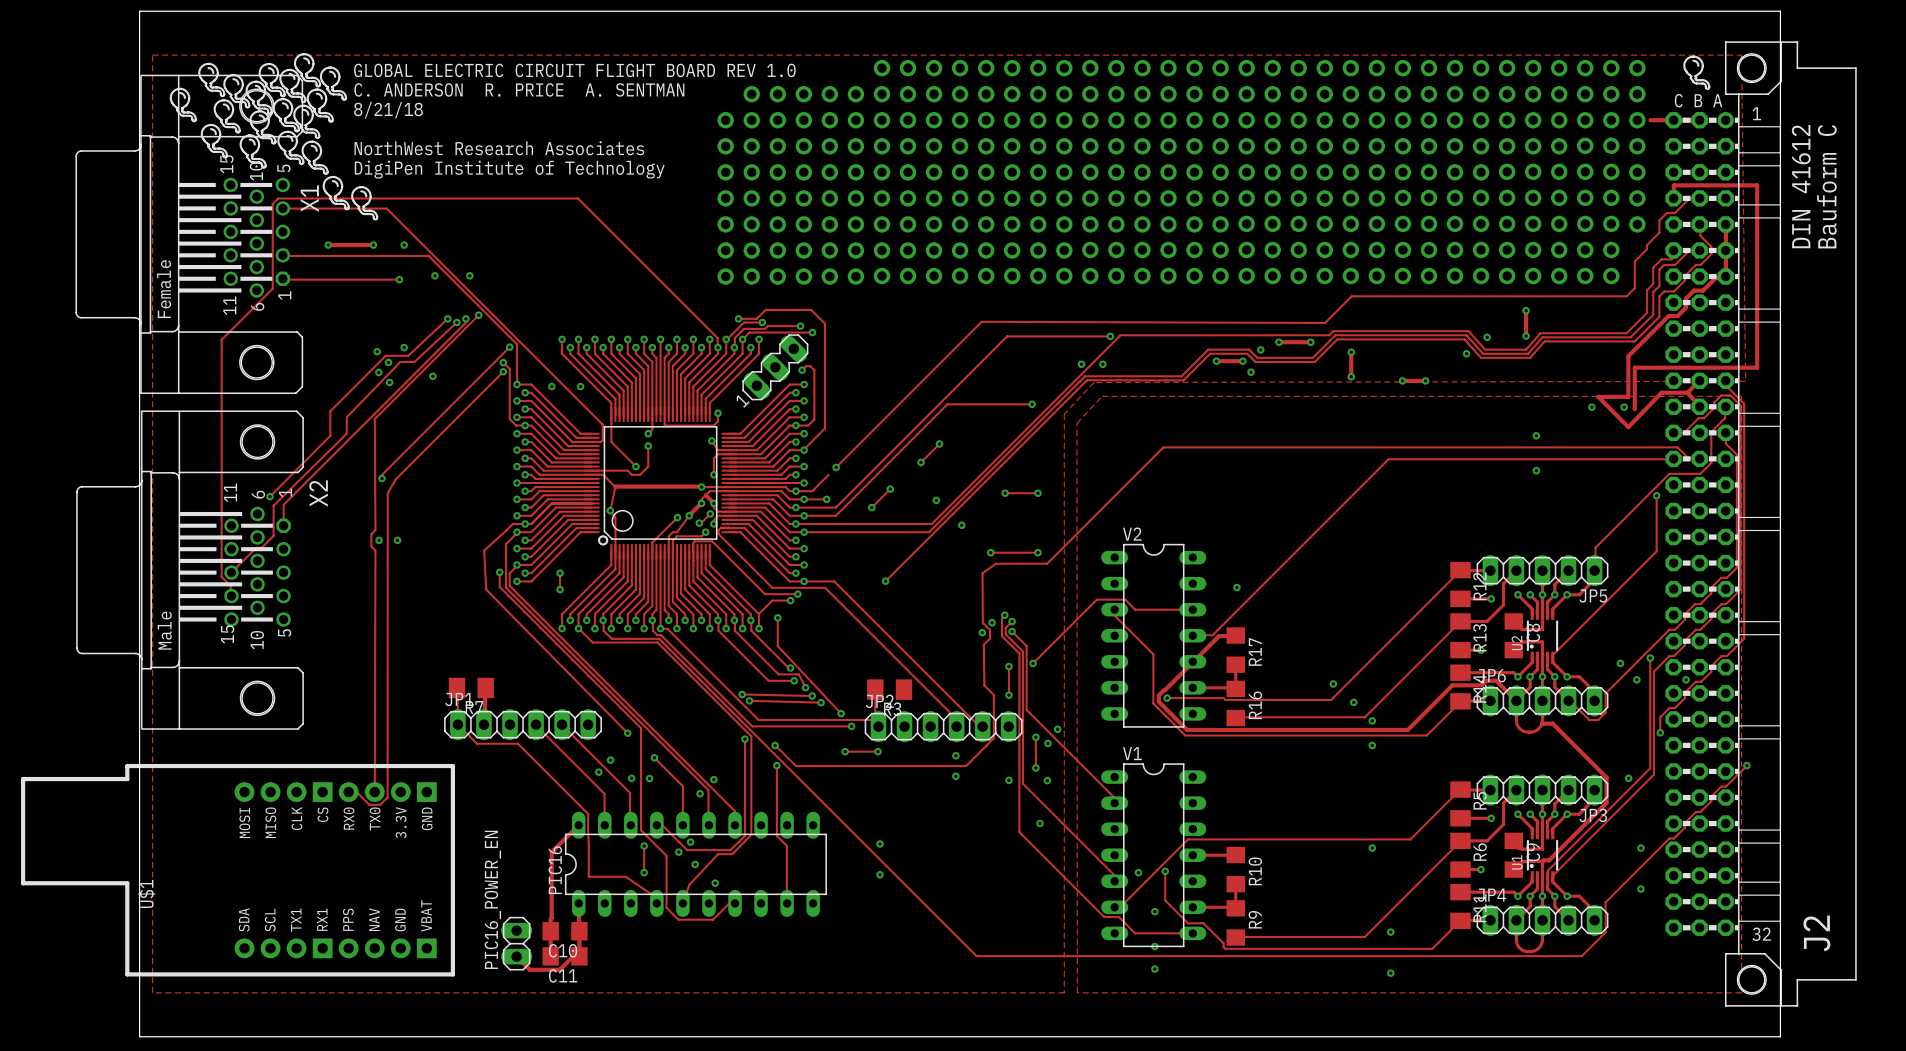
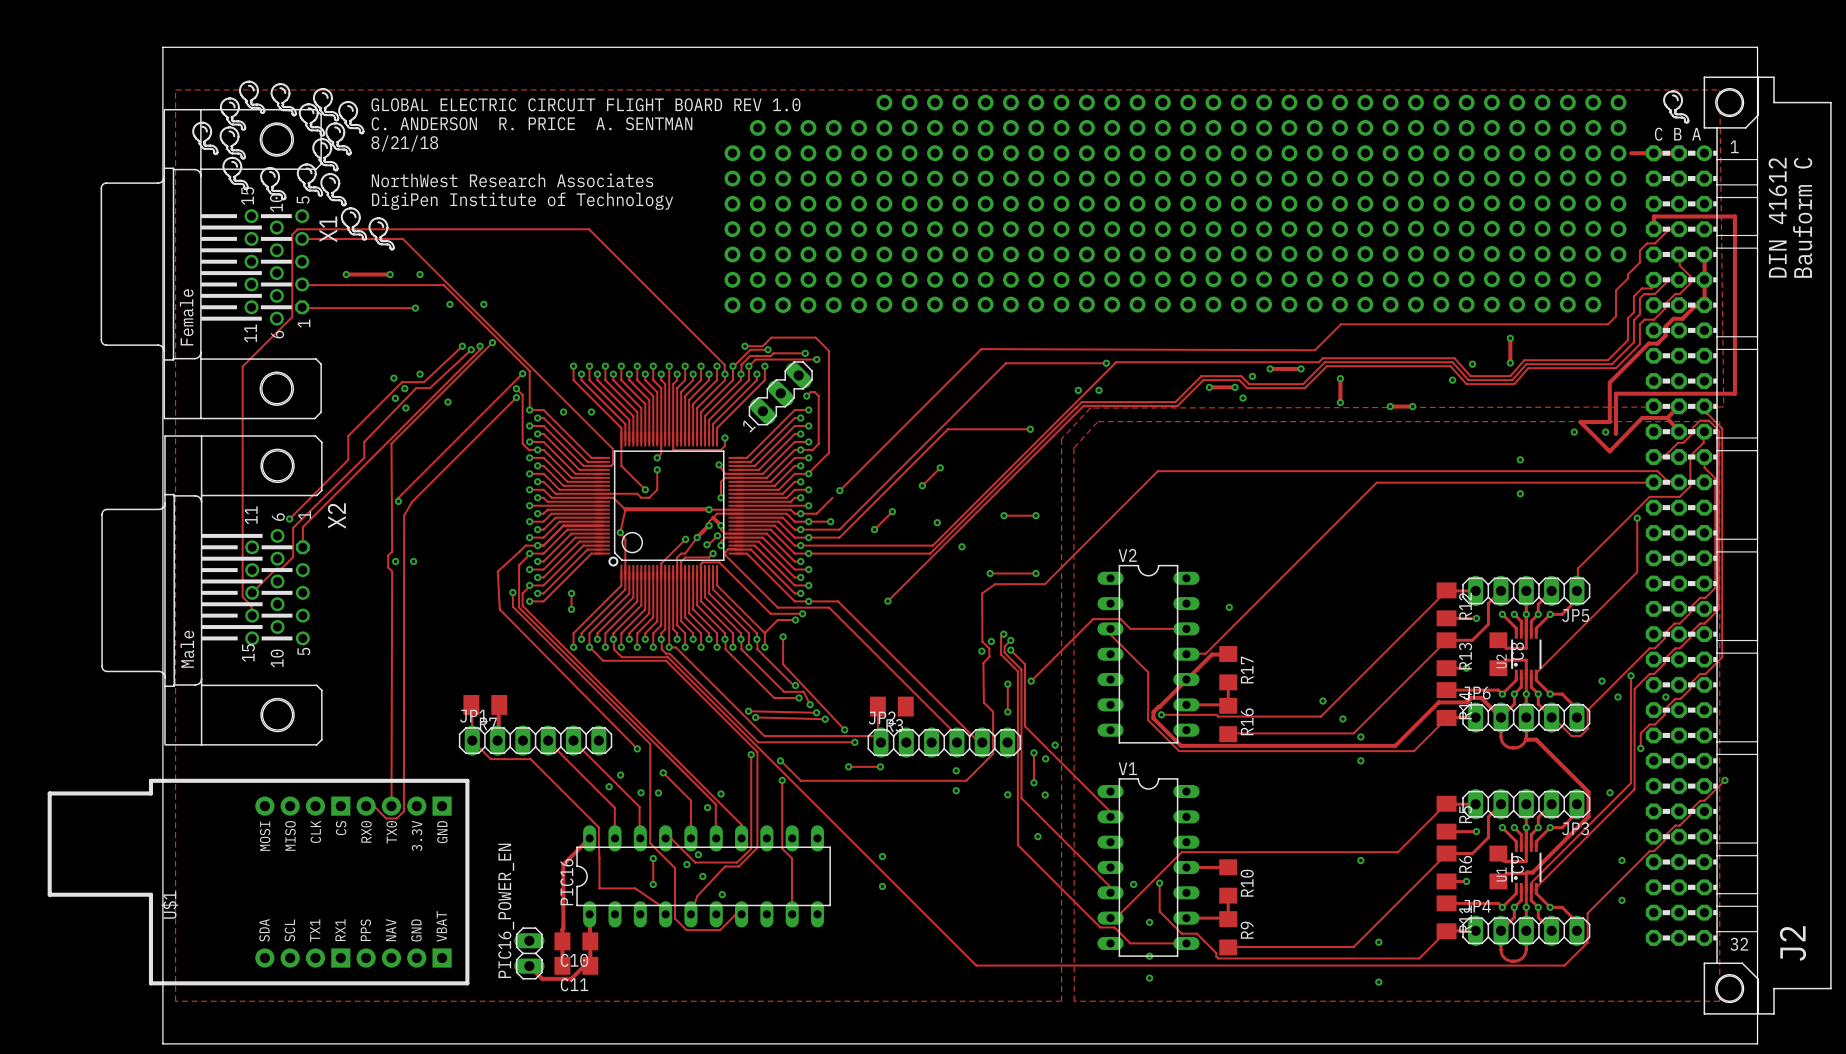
drawing: none -> [239, 80, 297, 117]
drawing: [213, 62, 300, 145] -> none
drawing: none -> [219, 126, 246, 160]

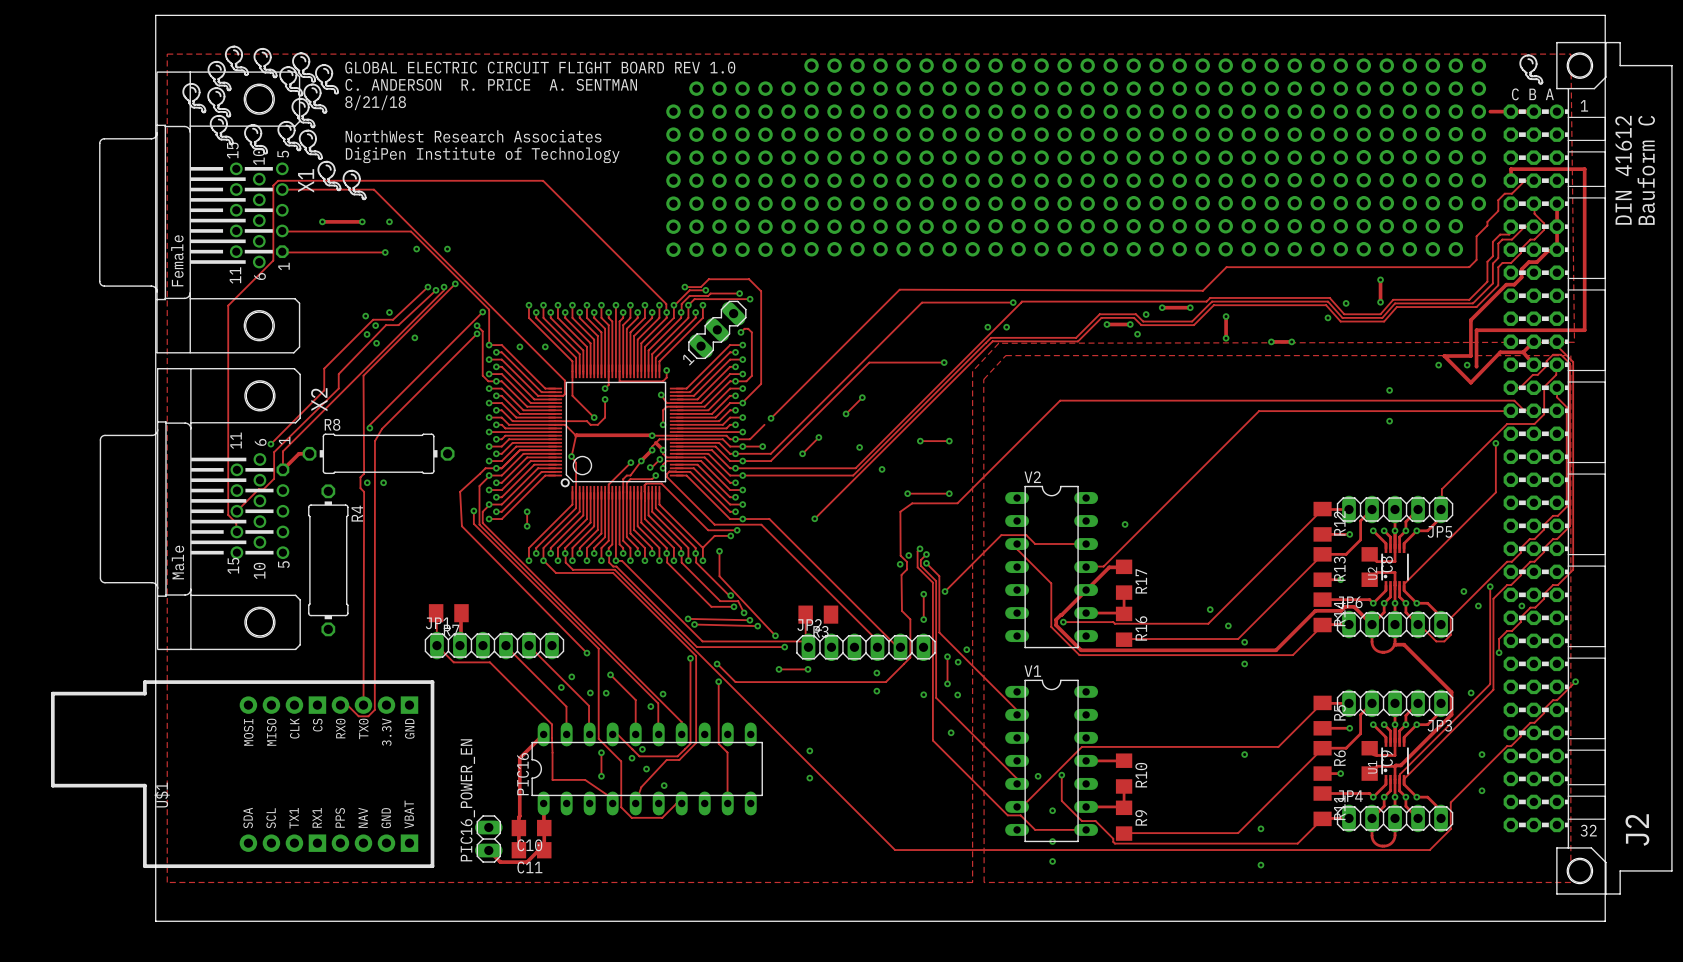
X2 name position: X2 (336, 515) -> X2 (319, 399)
track: none -> (309, 453) (298, 453) (282, 469)
R8: none -> (378, 453)
R4: none -> (328, 560)

